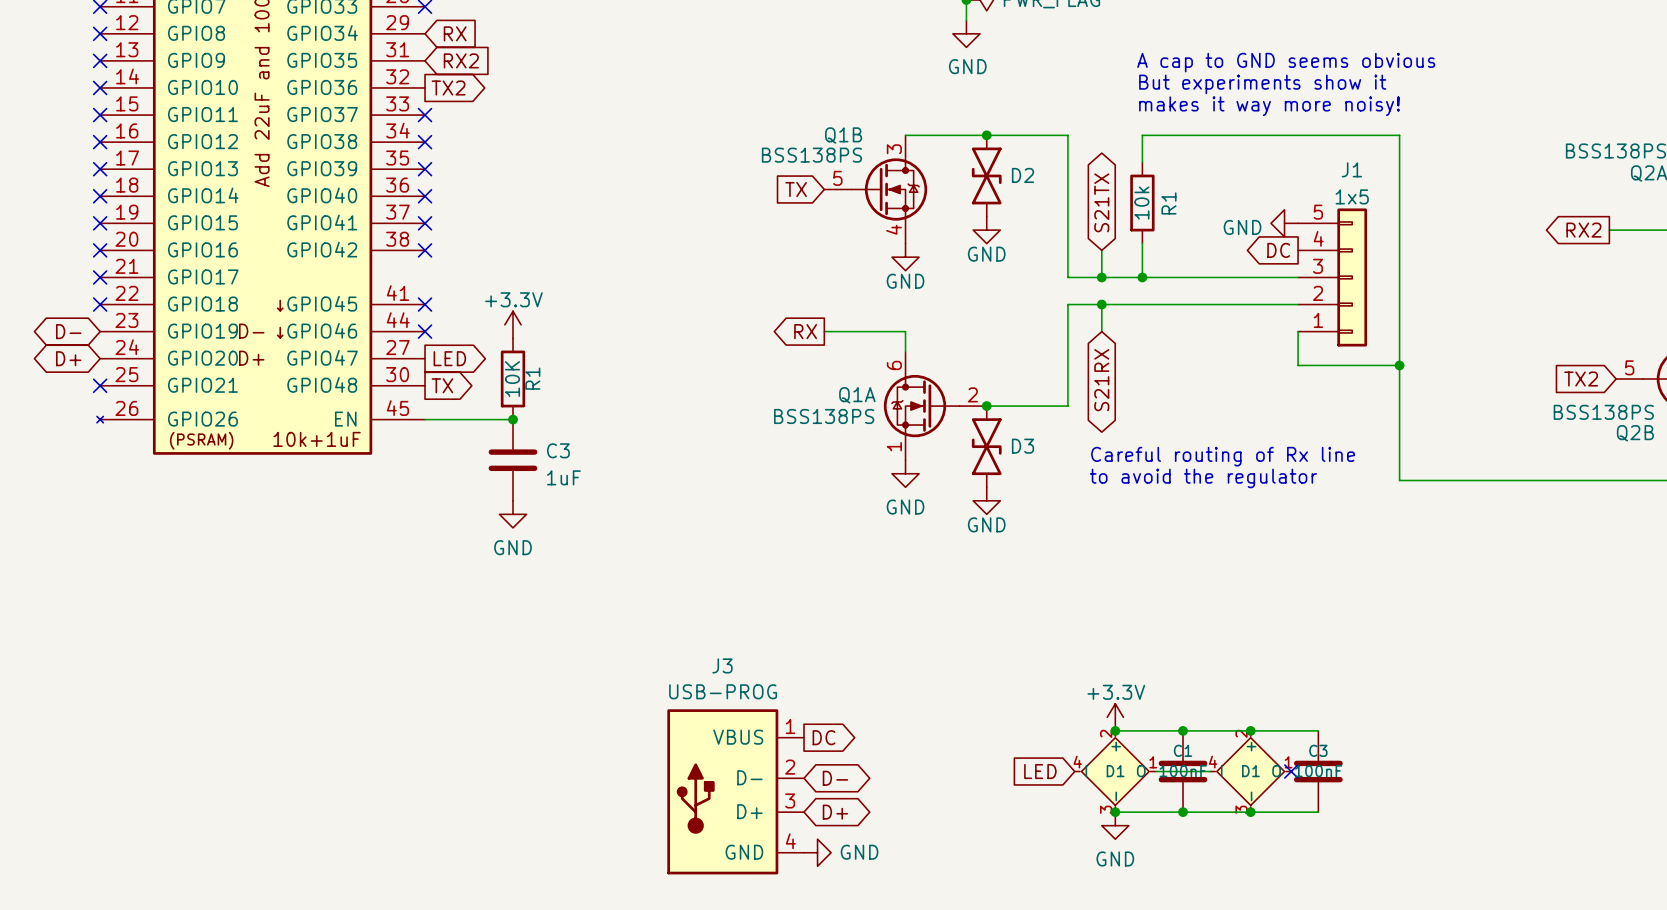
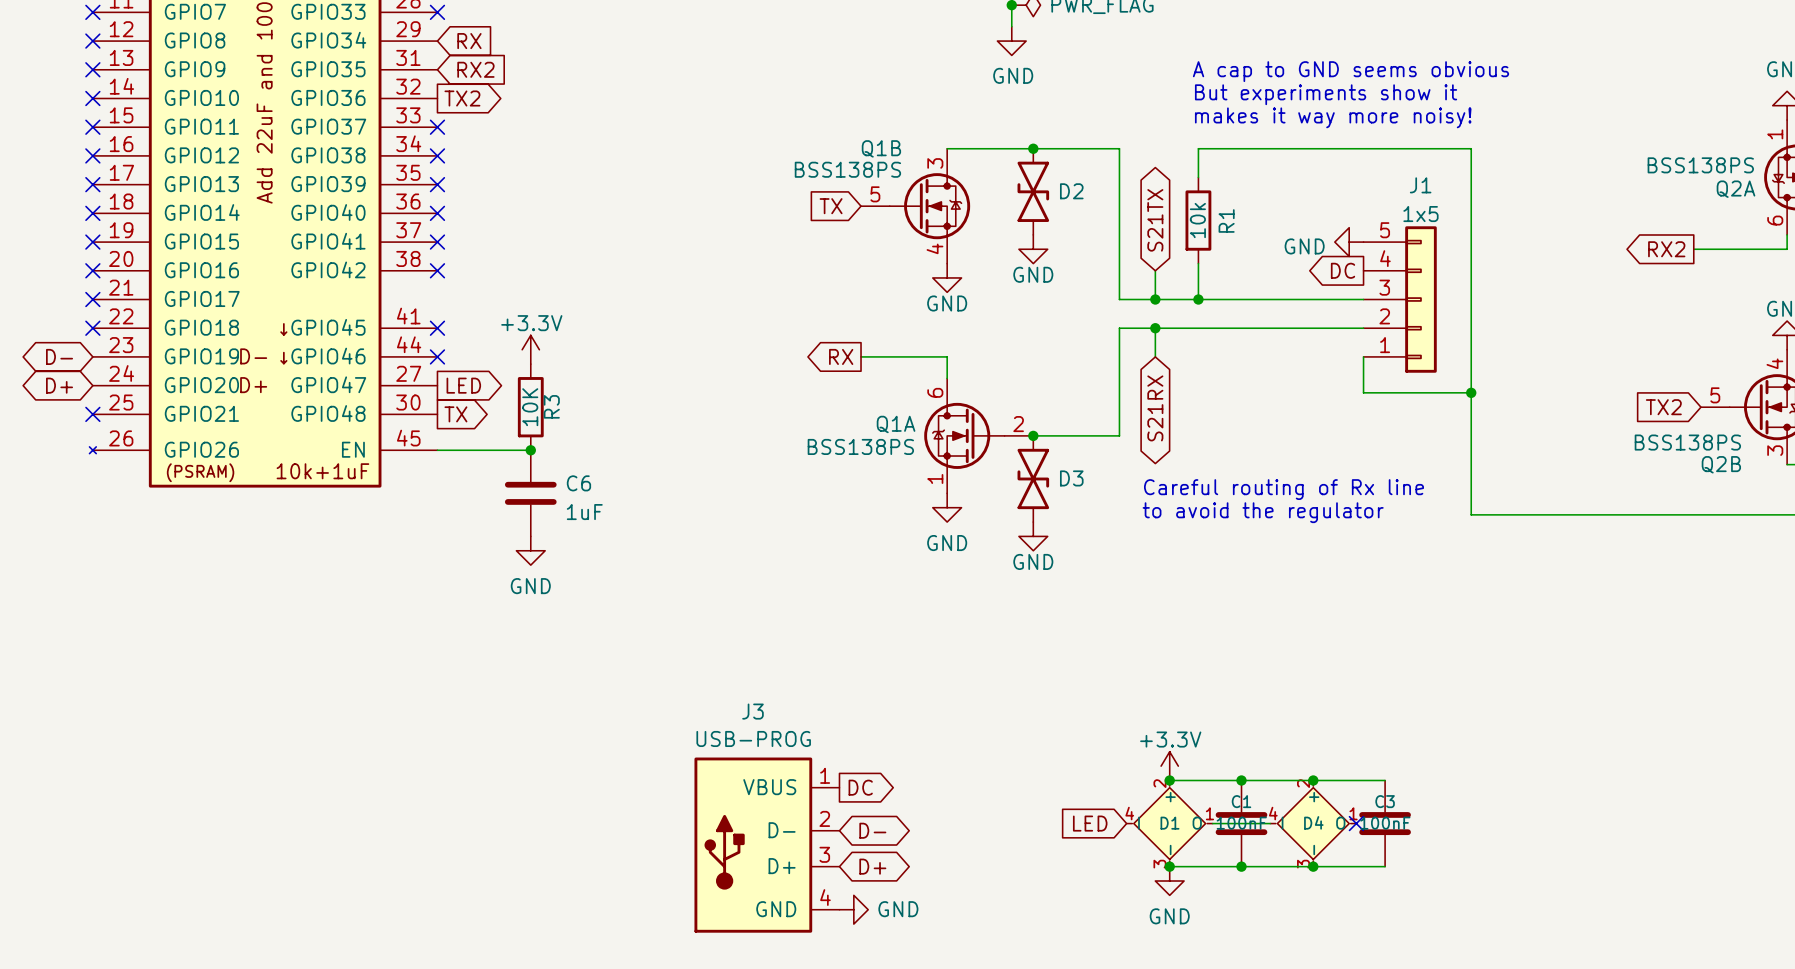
R1 name: R1 (532, 378) -> R3 (551, 406)
C3 name: C3 (558, 450) -> C6 (578, 483)
D1 name: D1 (1250, 771) -> D4 (1313, 822)

